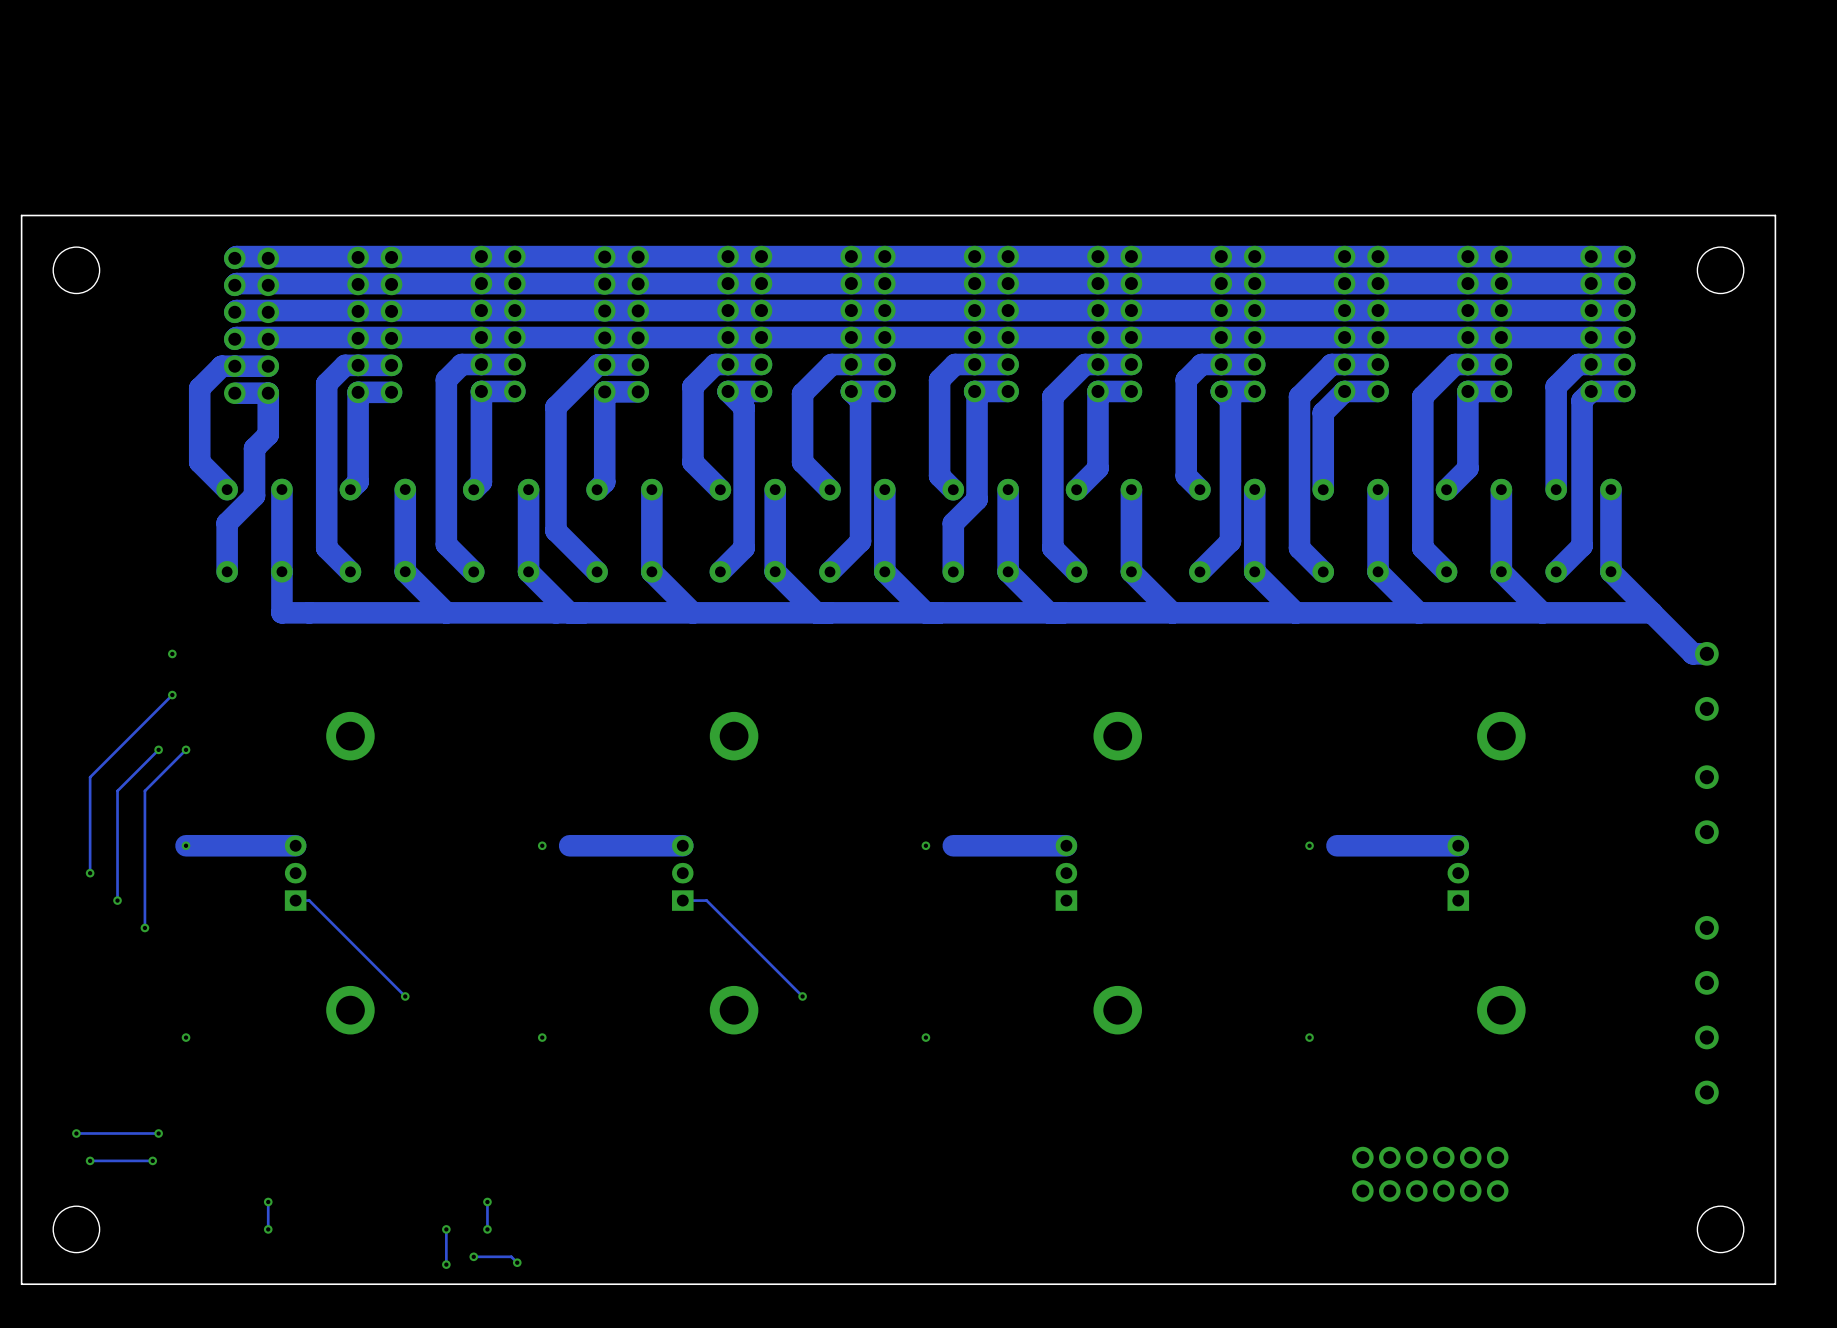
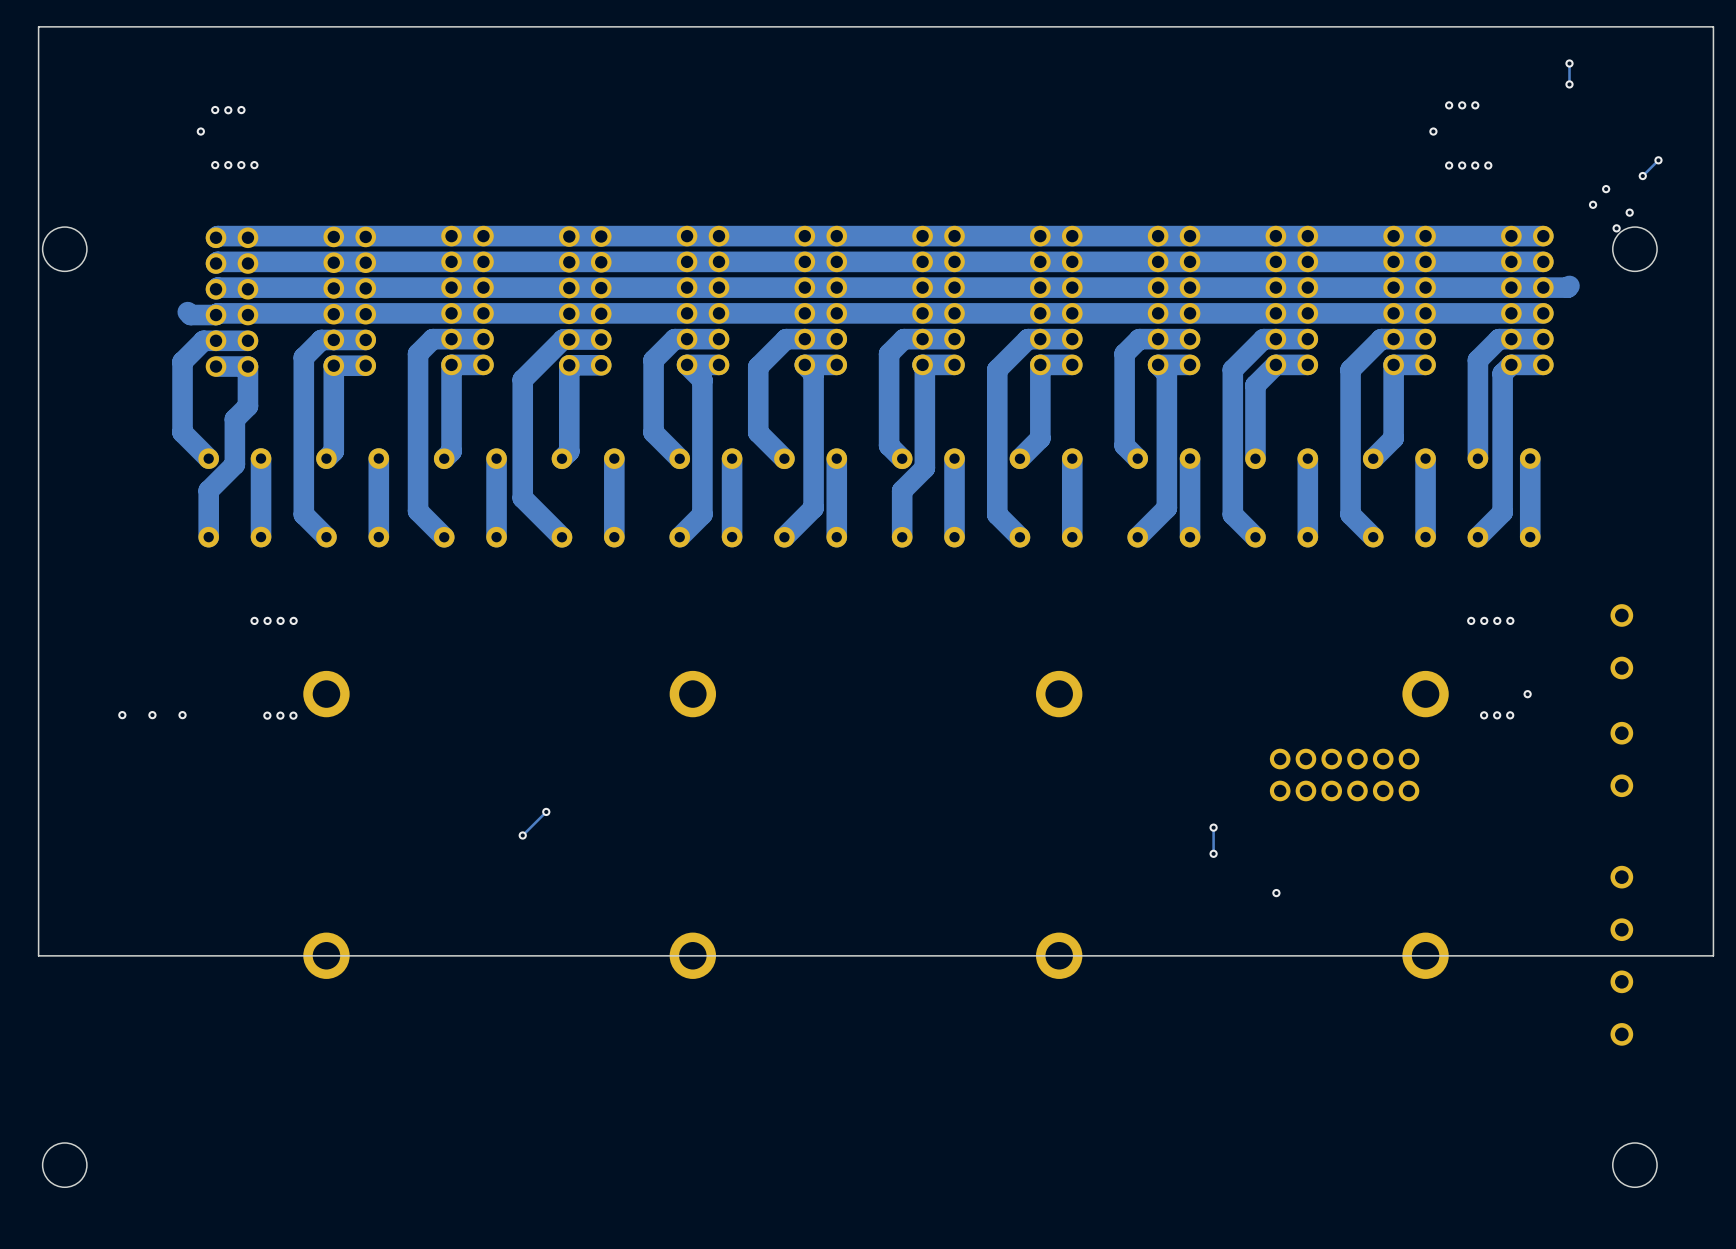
track: none -> (1569, 63) (1569, 84)
via: none -> (1569, 63)
via: none -> (1569, 84)
via: none -> (1449, 105)
via: none -> (1462, 105)
via: none -> (1475, 105)
via: none -> (215, 110)
via: none -> (228, 110)
via: none -> (241, 110)
via: none -> (200, 131)
via: none -> (1433, 131)
track: none -> (1658, 160) (1642, 176)
via: none -> (1658, 160)
via: none -> (215, 165)
via: none -> (228, 165)
via: none -> (241, 165)
via: none -> (254, 165)
via: none -> (1449, 165)
via: none -> (1462, 165)
via: none -> (1475, 165)
via: none -> (1488, 165)
via: none -> (1642, 176)
via: none -> (1606, 189)
board edge: (1775, 215) (21, 215) (21, 1284) (1775, 1284) (1775, 215) -> (1713, 26) (1713, 955) (38, 955) (38, 26) (1713, 26)
via: none -> (1593, 204)
via: none -> (1629, 212)
via: none -> (1616, 228)
track: none -> (1569, 285) (1567, 287) (1543, 287)
track: none -> (187, 312) (190, 315) (216, 315)
track: (281, 571) (281, 612) (1651, 612) (1692, 653) (1706, 653) -> none
track: (405, 571) (446, 612) -> none
track: (528, 571) (569, 612) -> none
track: (651, 571) (692, 612) -> none
track: (775, 571) (816, 612) -> none
track: (884, 571) (925, 612) -> none
track: (1008, 571) (1049, 612) -> none
track: (1131, 571) (1172, 612) -> none
track: (1254, 571) (1295, 612) -> none
track: (1378, 571) (1419, 612) -> none
track: (1501, 571) (1542, 612) -> none
track: (1610, 571) (1651, 612) -> none
via: (172, 653) -> none
via: none -> (254, 620)
via: none -> (267, 620)
via: none -> (280, 620)
via: none -> (293, 620)
via: none -> (1471, 620)
via: none -> (1484, 620)
via: none -> (1497, 620)
via: none -> (1510, 620)
track: (172, 695) (90, 777) (90, 873) -> none
via: (172, 695) -> none
via: none -> (1527, 694)
track: (158, 749) (117, 790) (117, 900) -> none
via: (158, 749) -> none
track: (186, 749) (144, 790) (144, 927) -> none
via: (186, 749) -> none
via: none -> (122, 715)
via: none -> (152, 715)
via: none -> (182, 715)
via: none -> (267, 715)
via: none -> (280, 715)
via: none -> (293, 715)
via: none -> (1484, 715)
via: none -> (1497, 715)
via: none -> (1510, 715)
part: none -> (1344, 774)
via: (186, 845) -> none
track: (295, 845) (186, 845) -> none
via: (542, 845) -> none
track: (682, 845) (569, 845) -> none
via: (925, 845) -> none
track: (1066, 845) (953, 845) -> none
via: (1309, 845) -> none
track: (1458, 845) (1336, 845) -> none
track: none -> (546, 811) (522, 835)
via: none -> (546, 811)
via: (90, 873) -> none
part: (295, 873) -> none
part: (682, 873) -> none
part: (1066, 873) -> none
part: (1458, 873) -> none
track: none -> (1213, 827) (1213, 853)
via: none -> (1213, 827)
via: none -> (522, 835)
via: (117, 900) -> none
track: (295, 900) (309, 900) (405, 996) -> none
track: (682, 900) (706, 900) (802, 996) -> none
via: none -> (1213, 853)
via: (144, 927) -> none
via: none -> (1276, 893)
via: (405, 996) -> none
via: (802, 996) -> none
via: (186, 1037) -> none
via: (542, 1037) -> none
via: (925, 1037) -> none
via: (1309, 1037) -> none
via: (76, 1133) -> none
track: (158, 1133) (76, 1133) -> none
via: (158, 1133) -> none
via: (90, 1160) -> none
track: (152, 1160) (90, 1160) -> none
via: (152, 1160) -> none
part: (1430, 1174) -> none
track: (268, 1202) (268, 1229) -> none
via: (268, 1202) -> none
track: (487, 1202) (487, 1229) -> none
via: (487, 1202) -> none
via: (268, 1229) -> none
track: (446, 1229) (446, 1264) -> none
via: (446, 1229) -> none
via: (487, 1229) -> none
track: (473, 1256) (511, 1256) (517, 1262) -> none
via: (473, 1256) -> none
via: (517, 1262) -> none
via: (446, 1264) -> none

